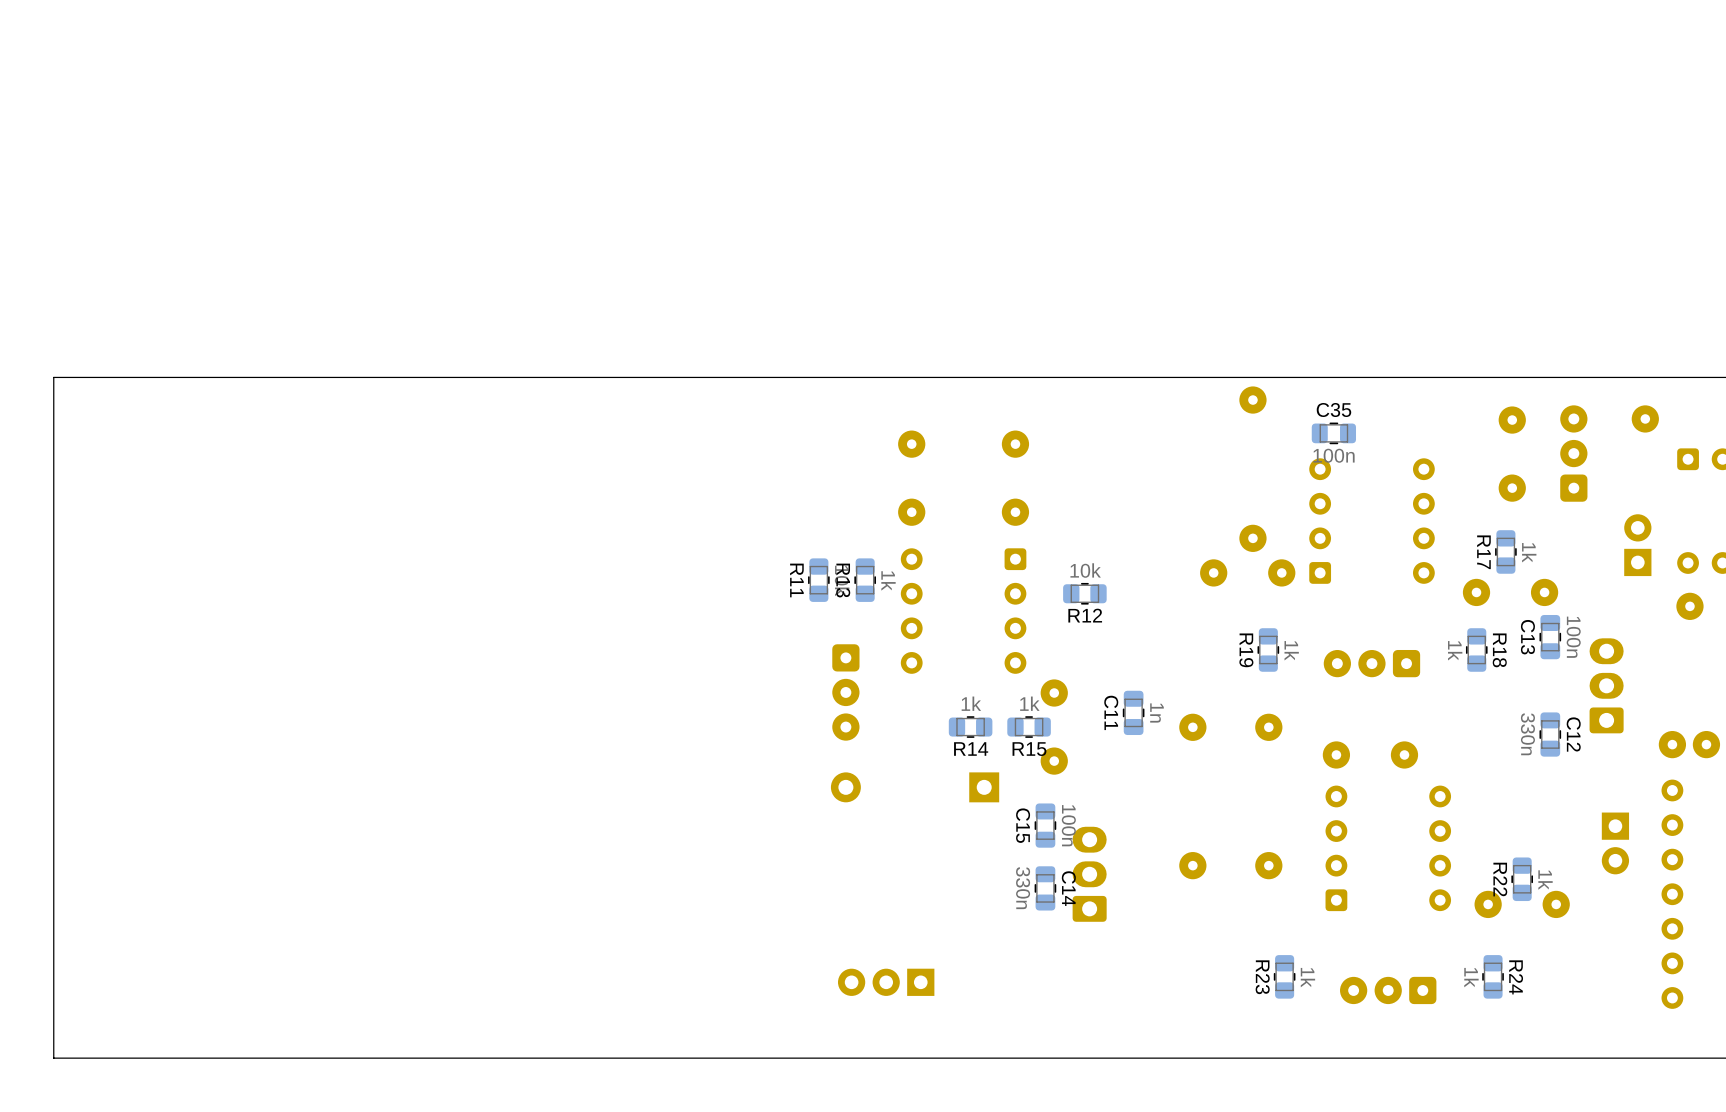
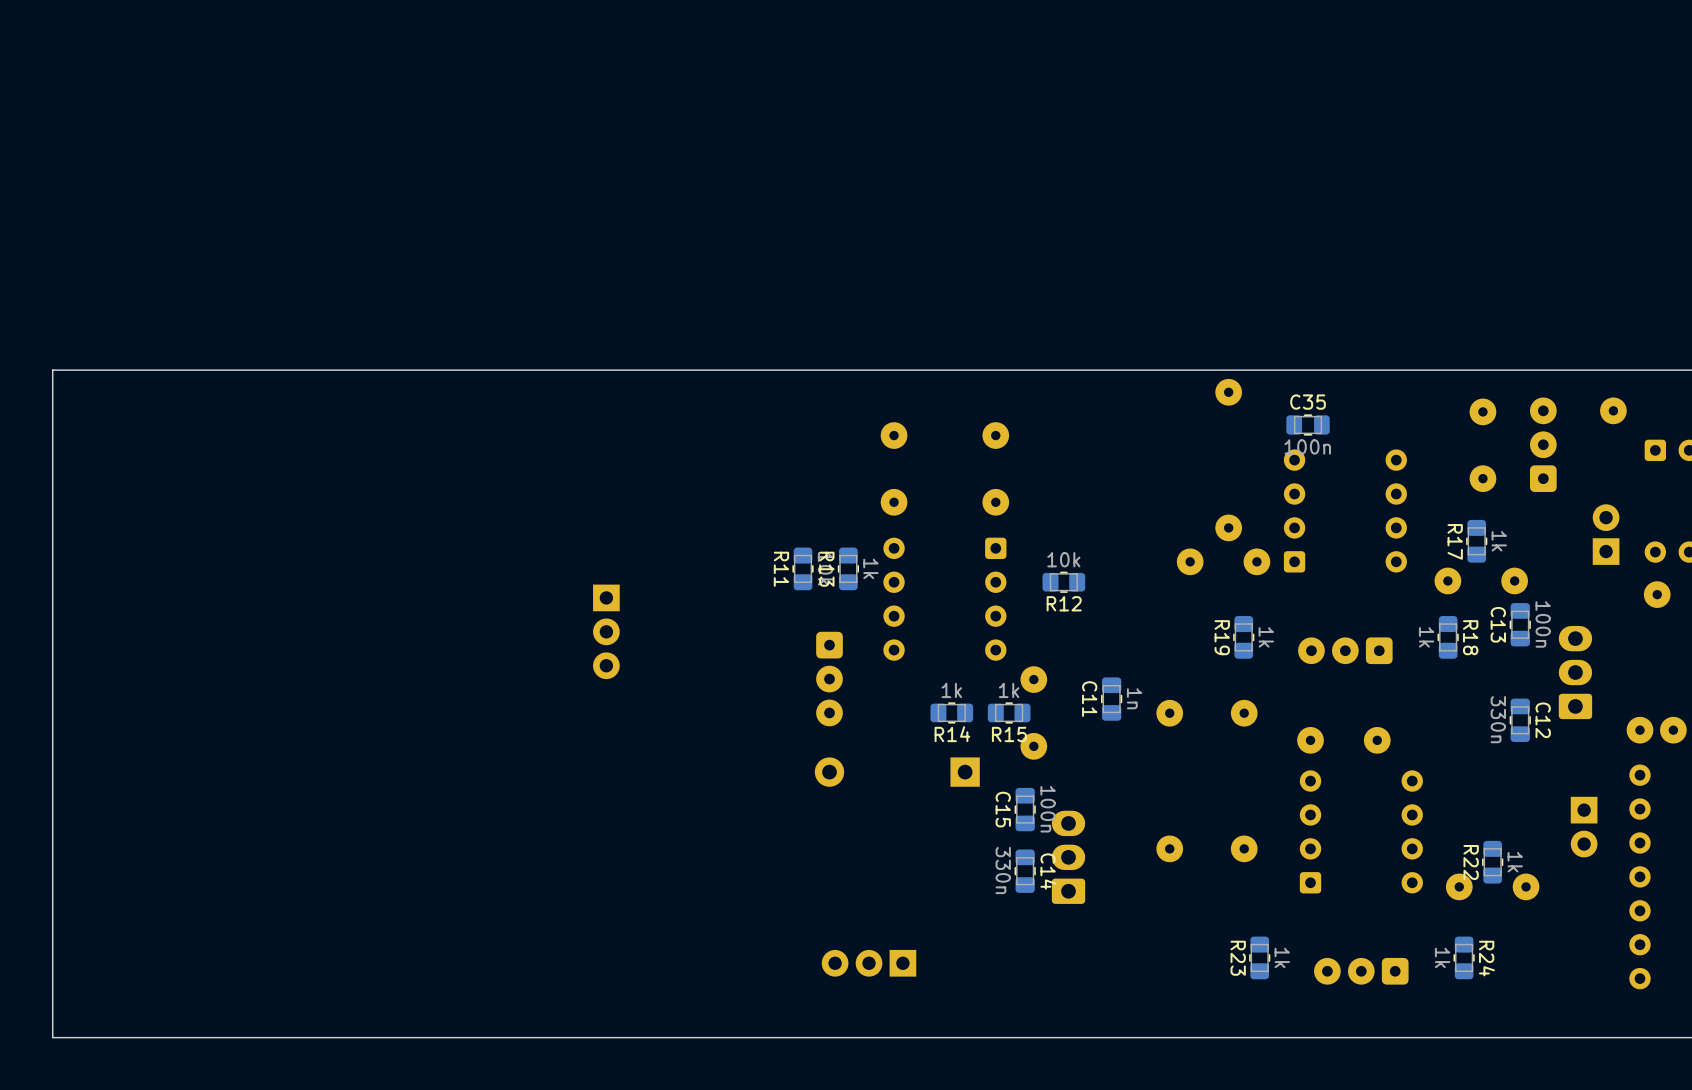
part: none -> (606, 631)

